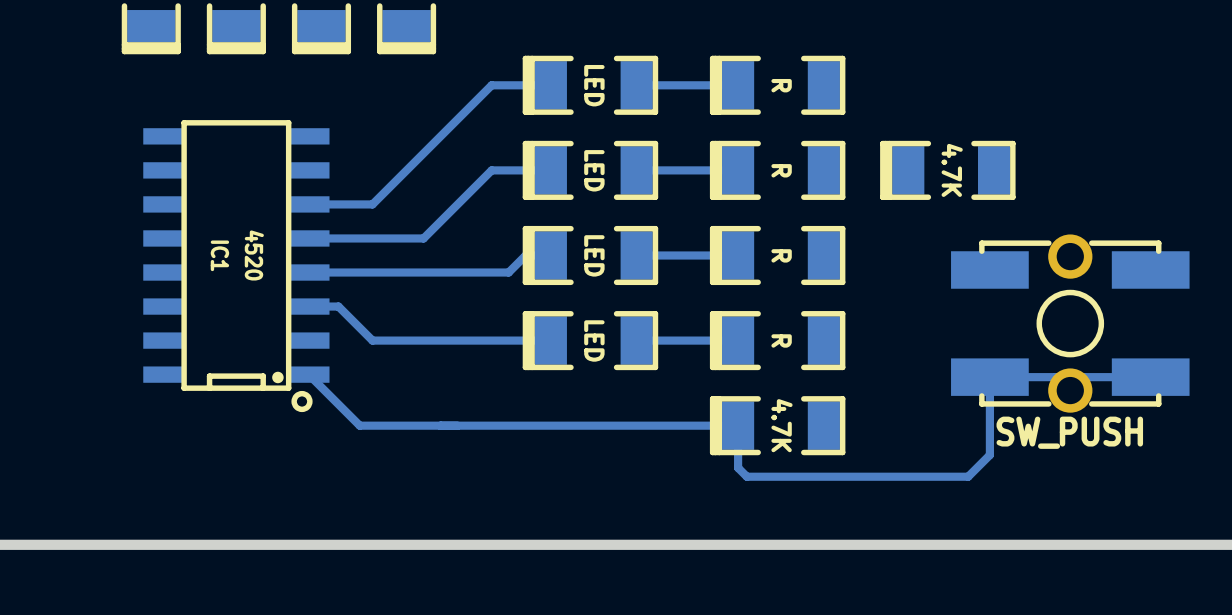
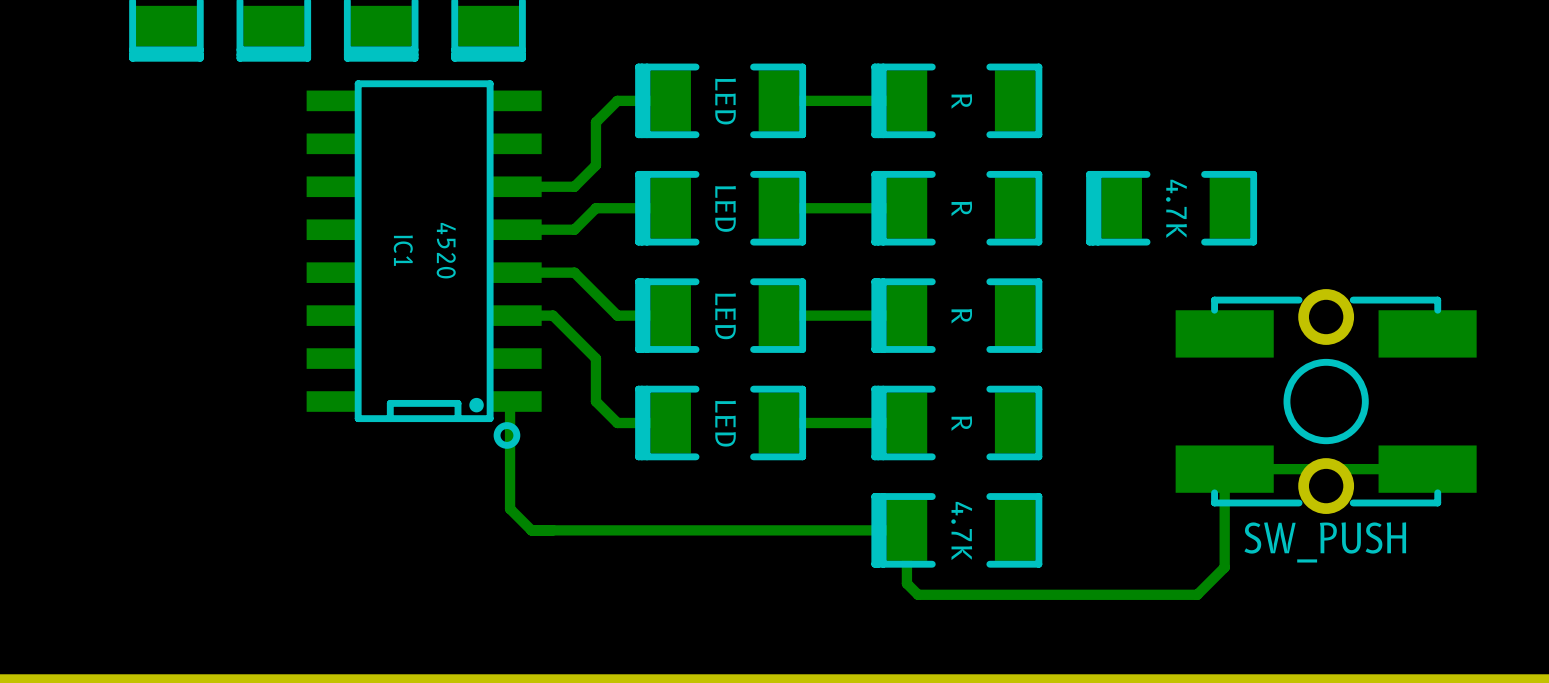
bottom track: (508, 85) (491, 85) (372, 204) (308, 204) -> (617, 100) (595, 122) (595, 165) (574, 186) (515, 186)
bottom track: (474, 187) (423, 238) (308, 238) -> (574, 229) (515, 229)
bottom track: (525, 255) (508, 272) (308, 272) -> (638, 315) (617, 315) (574, 272) (515, 272)
IC1 position: (236, 266) -> (424, 264)
bottom track: (308, 306) (338, 306) (372, 340) (508, 340) -> (515, 315) (553, 315) (595, 358) (595, 401) (617, 423)
bottom track: (308, 374) (359, 425) (440, 425) -> (515, 401) (510, 406) (510, 508) (531, 530)

